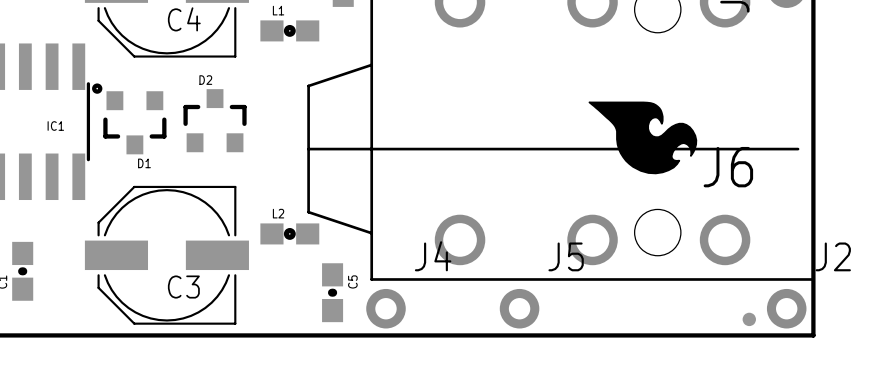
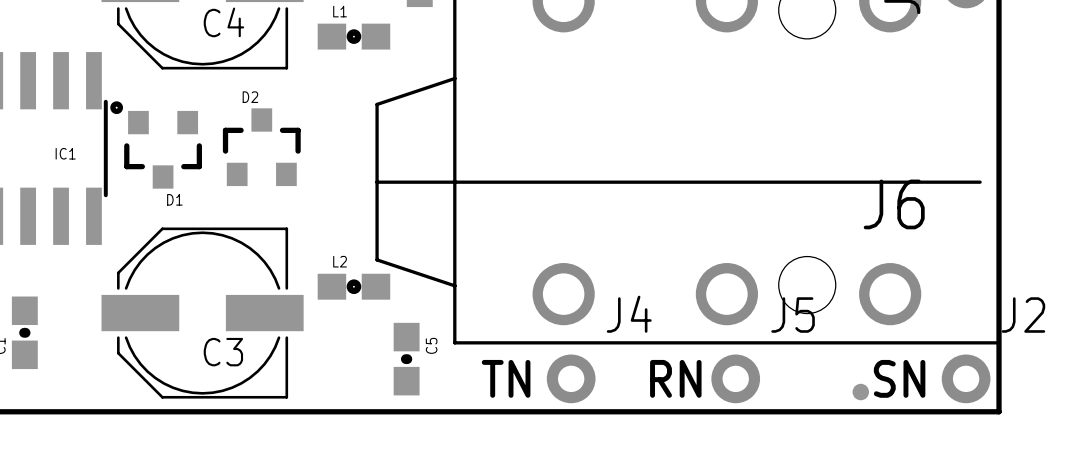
drawing: [588, 101, 698, 175] -> none
J4 position: (385, 308) -> (571, 378)
text: none -> TN (506, 378)
J5 position: (519, 308) -> (735, 378)
text: none -> RN (675, 378)
text: none -> SN (899, 378)
part position: (749, 319) -> (860, 392)

